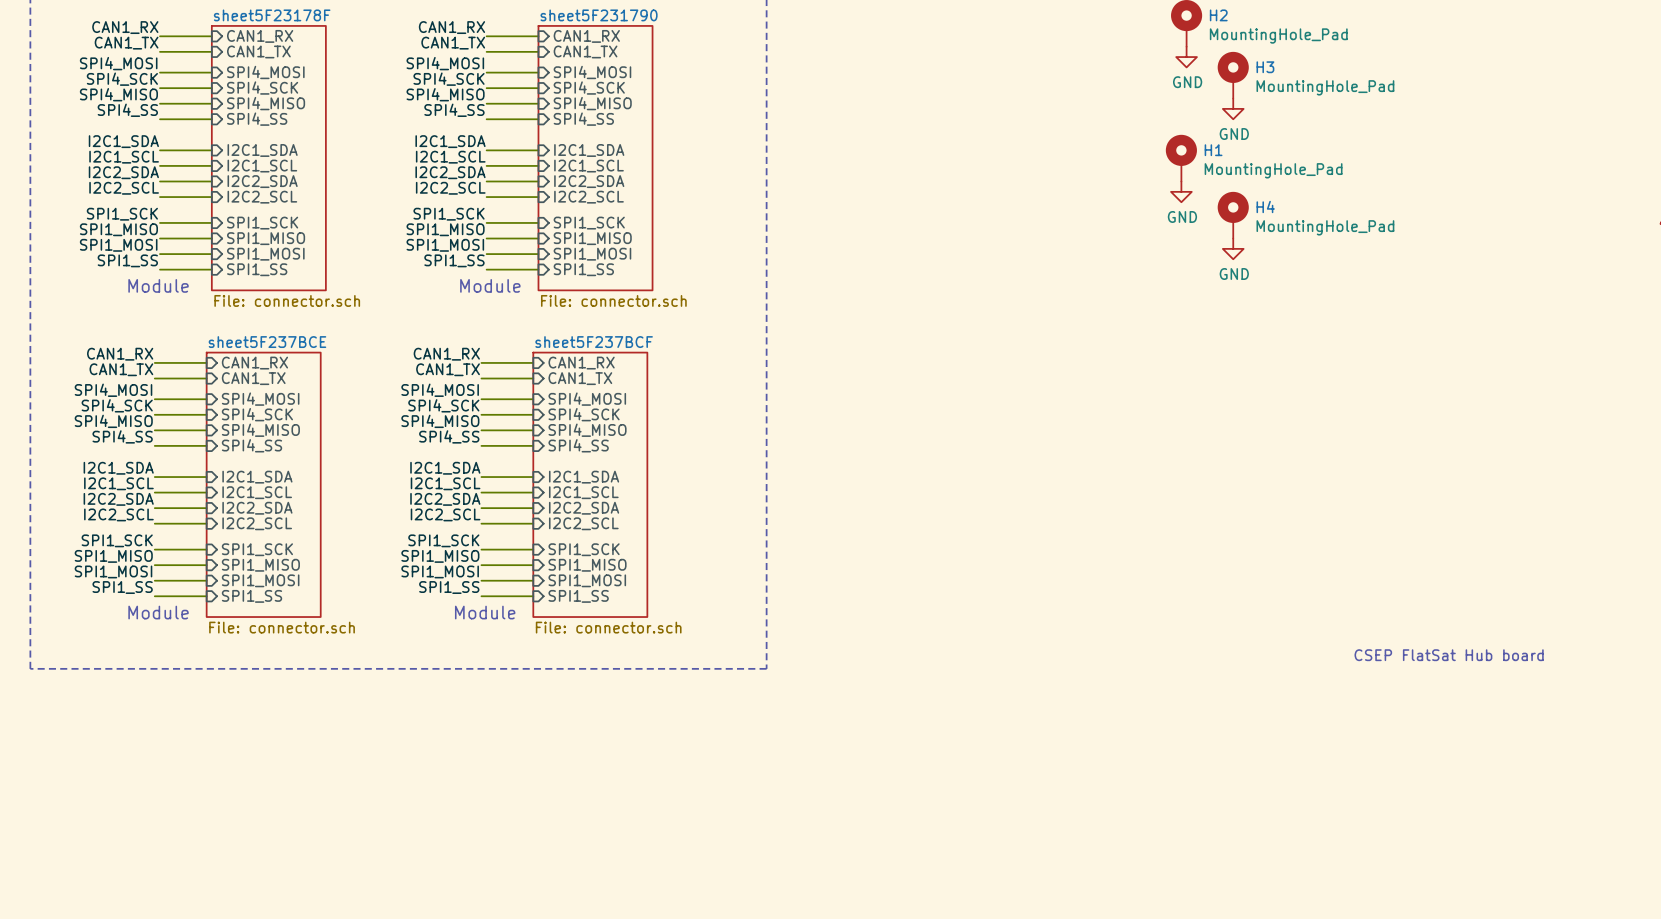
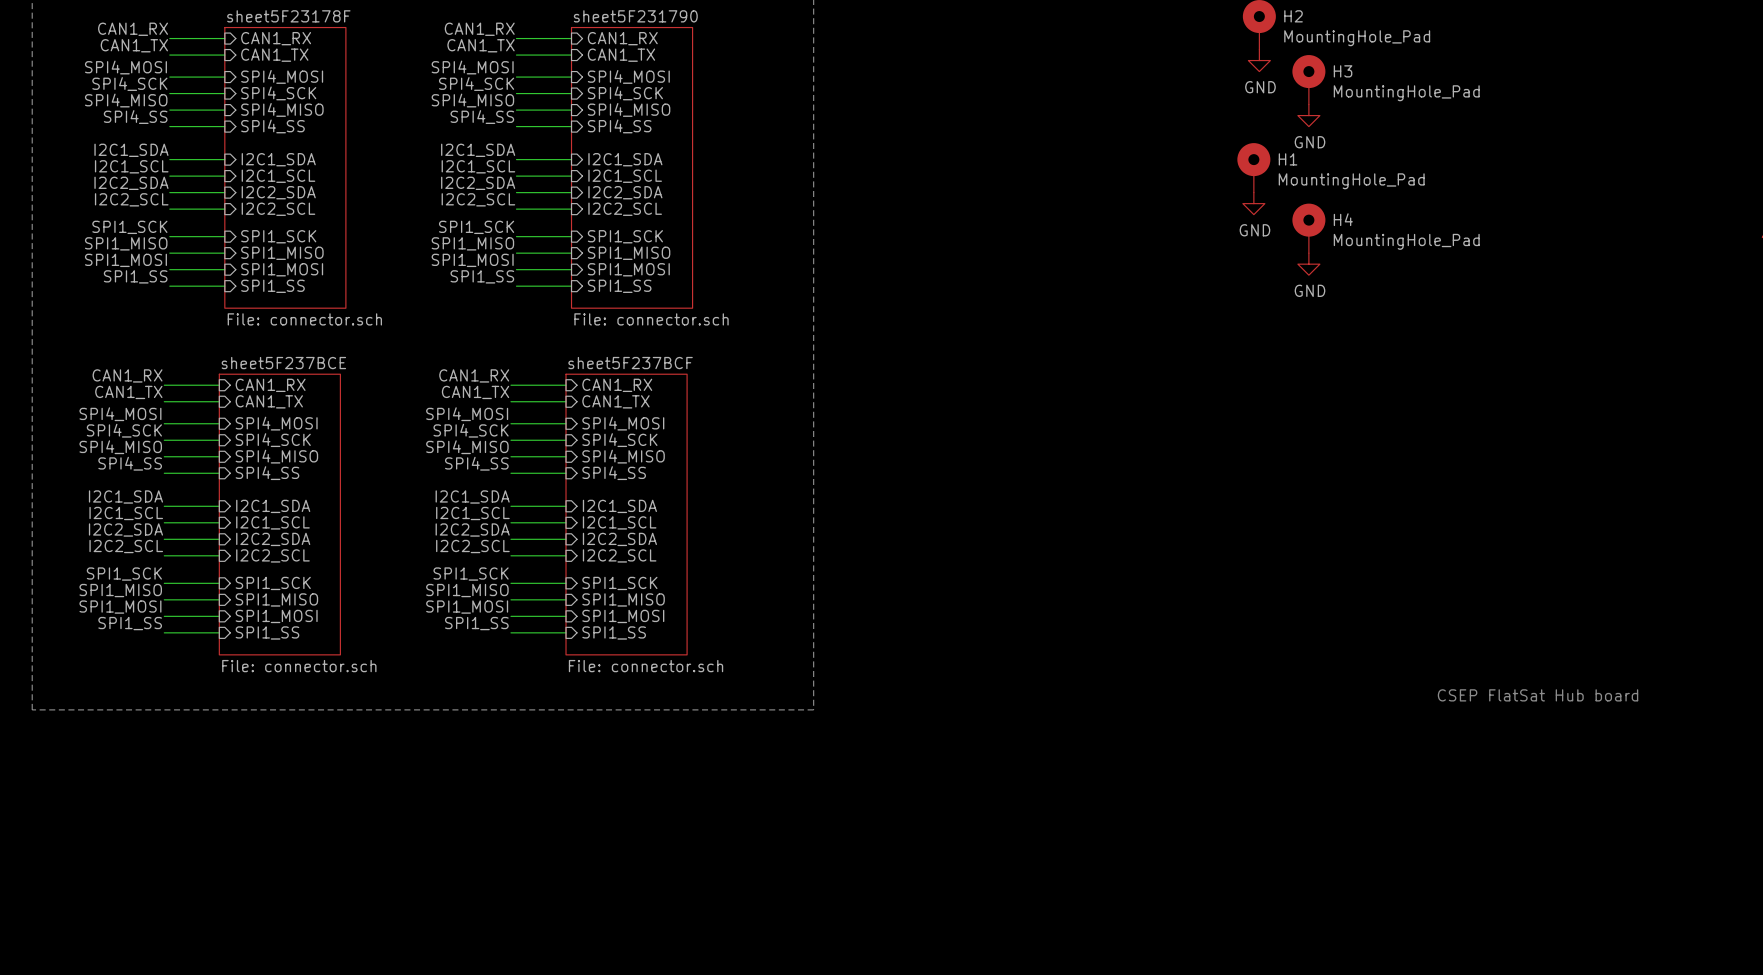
text: Module (158, 285) -> none
text: Module (490, 285) -> none
text: Module (158, 612) -> none
text: Module (485, 612) -> none

